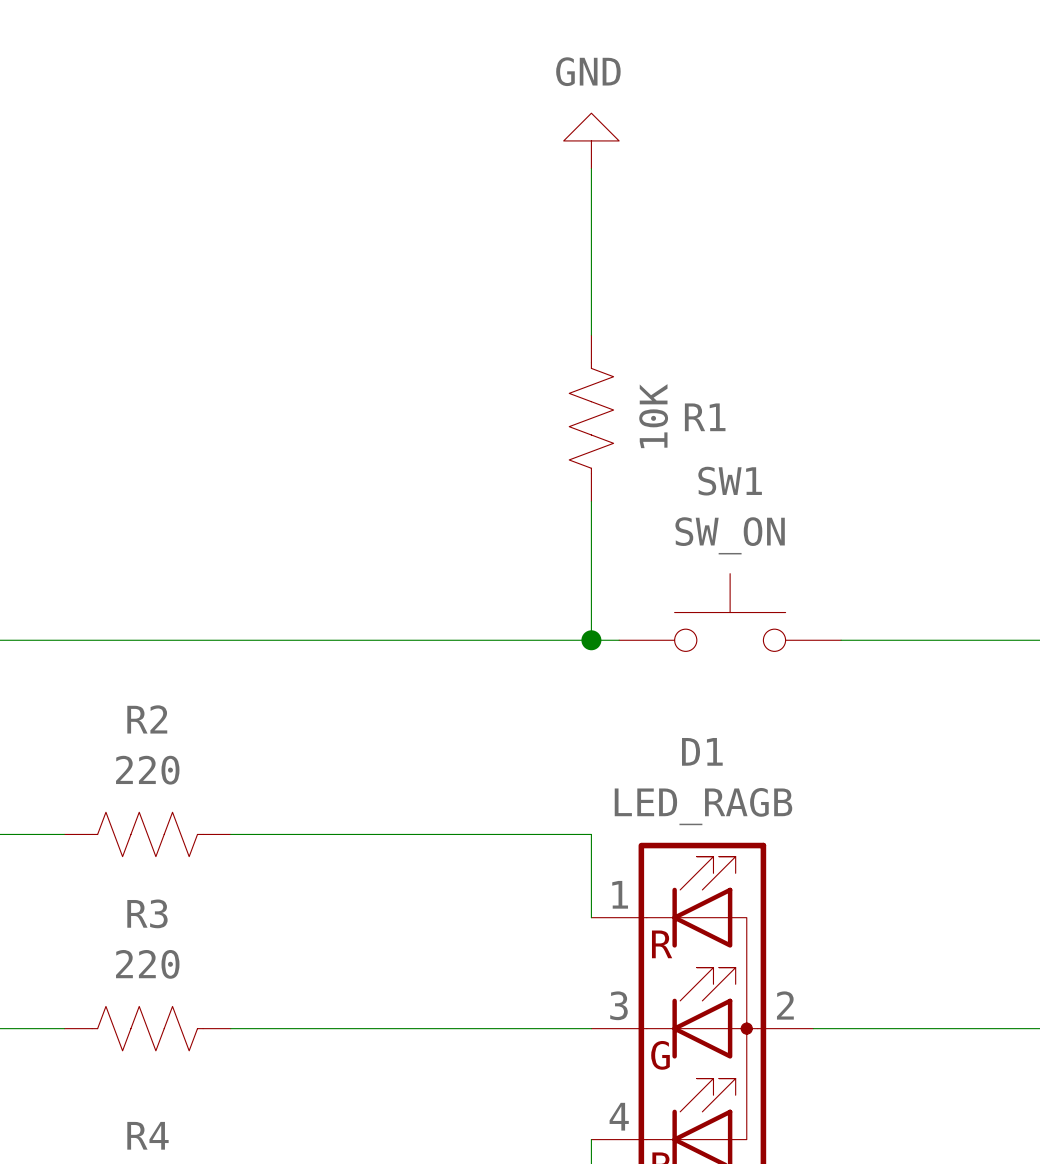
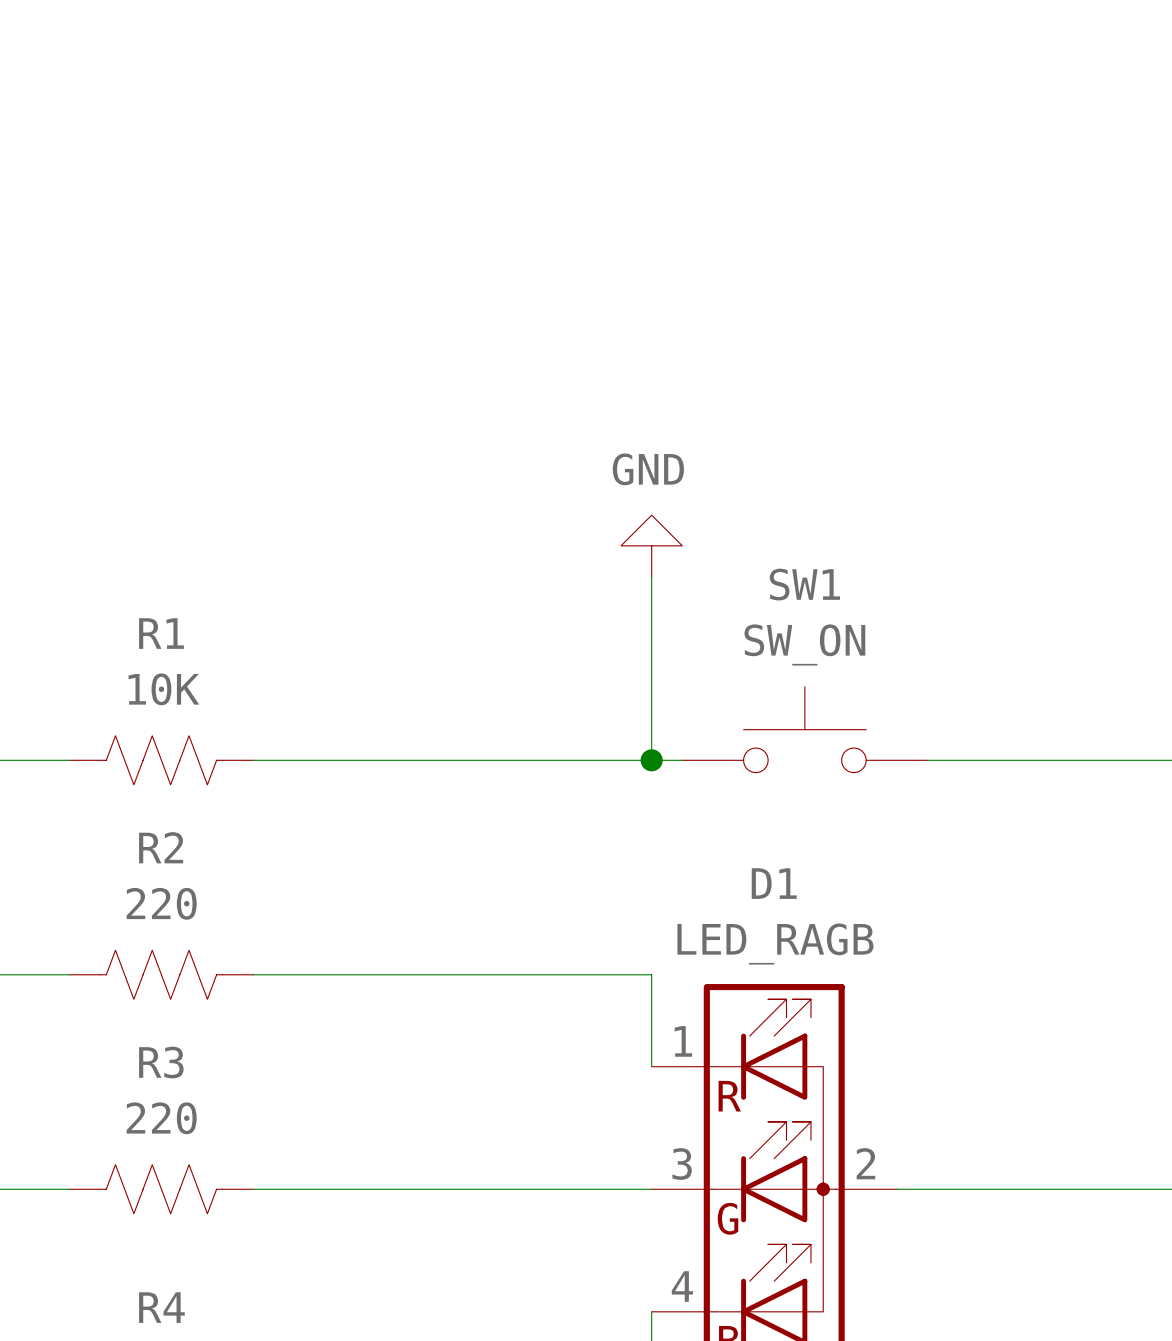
power symbol position: GND (591, 140) -> GND (651, 545)
wire: (591, 168) (591, 335) -> none
R1 value position: 10K (653, 416) -> 10K (163, 689)
R1 name position: R1 (705, 417) -> R1 (161, 633)
R1 rotation: 0° (591, 418) -> 90° clockwise (161, 760)
R1 position: (591, 418) -> (161, 760)
wire: (64, 640) (230, 640) -> none

